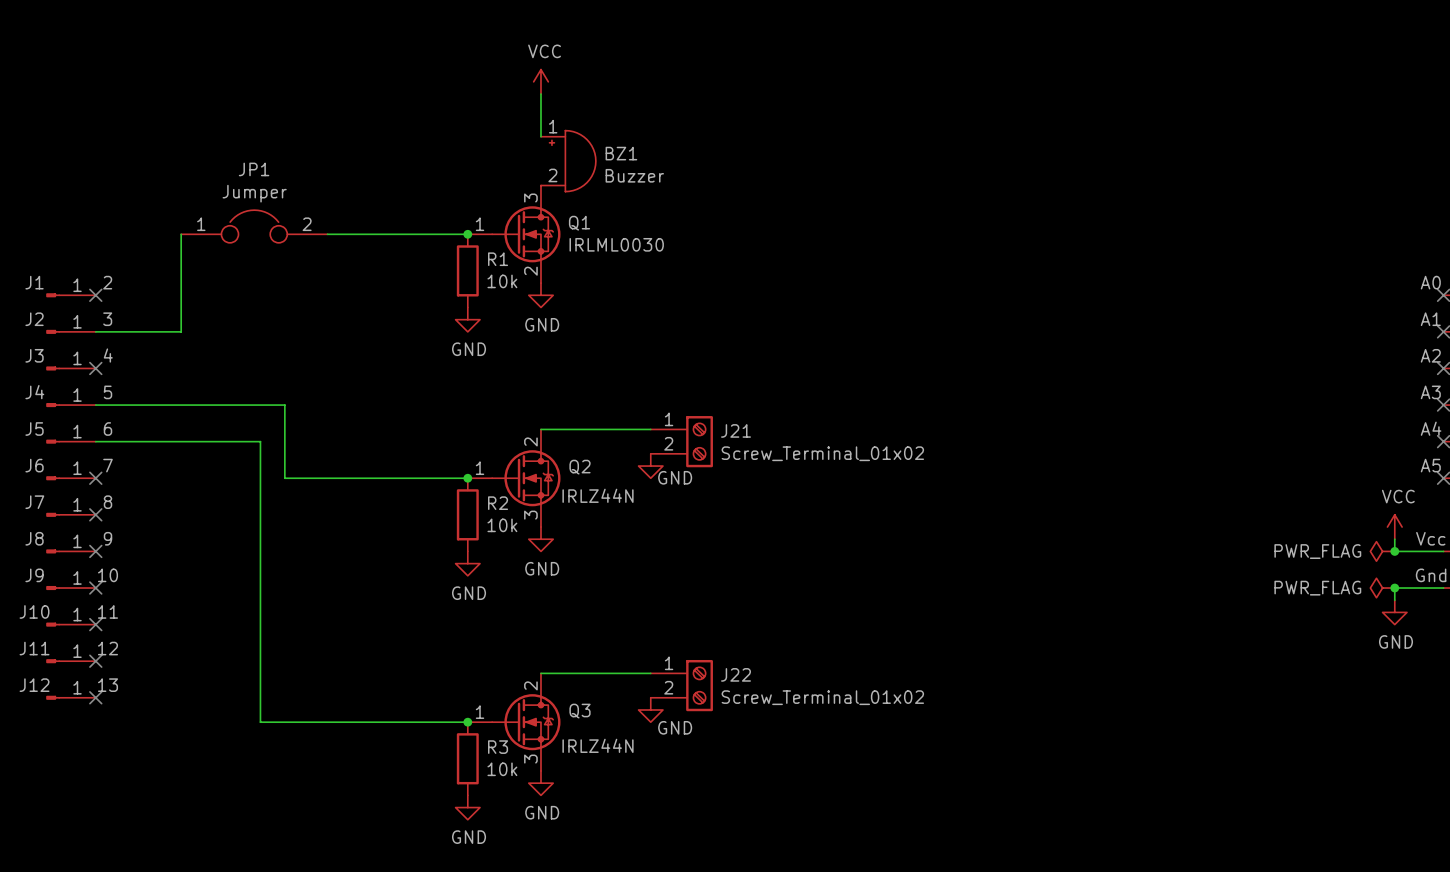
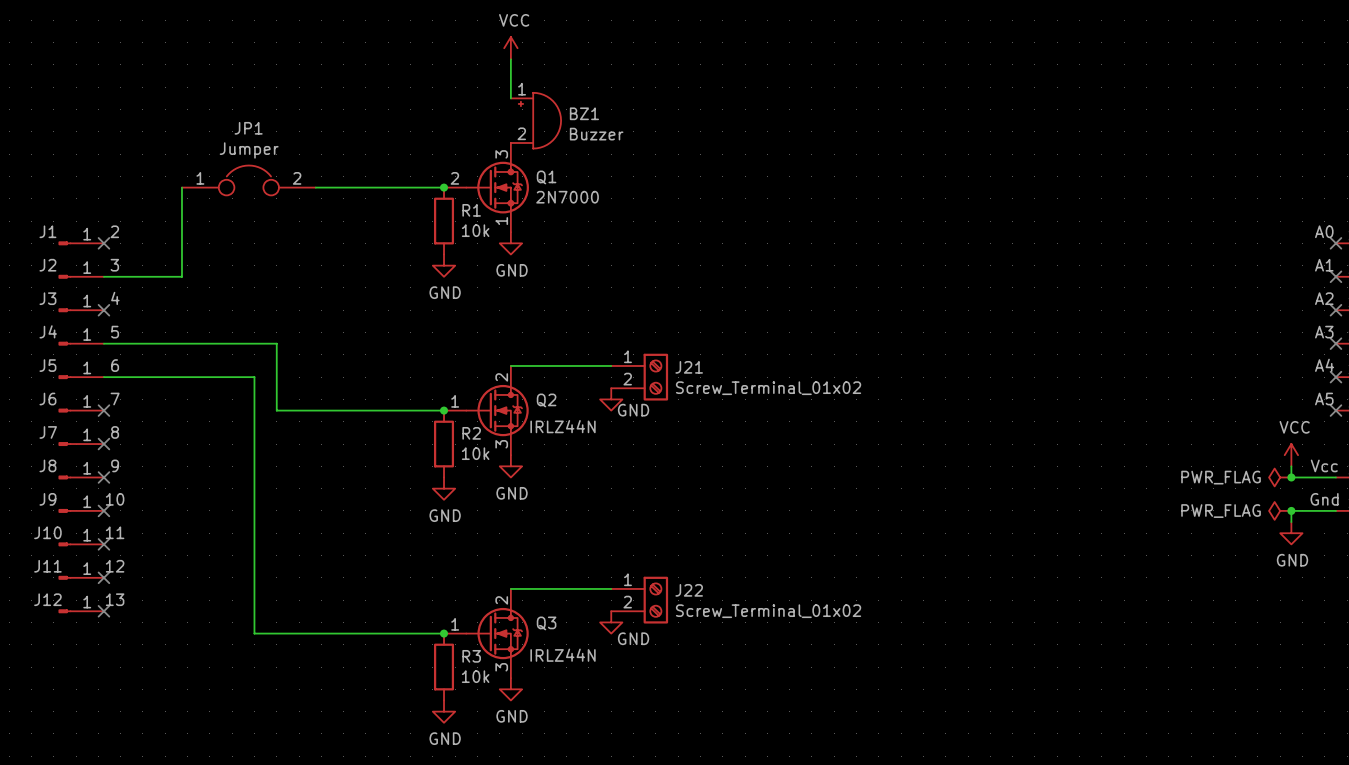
Q1 symbol: [467, 185, 561, 284] -> [444, 142, 529, 233]
Q1 value: IRLML0030 (616, 244) -> 2N7000 (567, 197)

